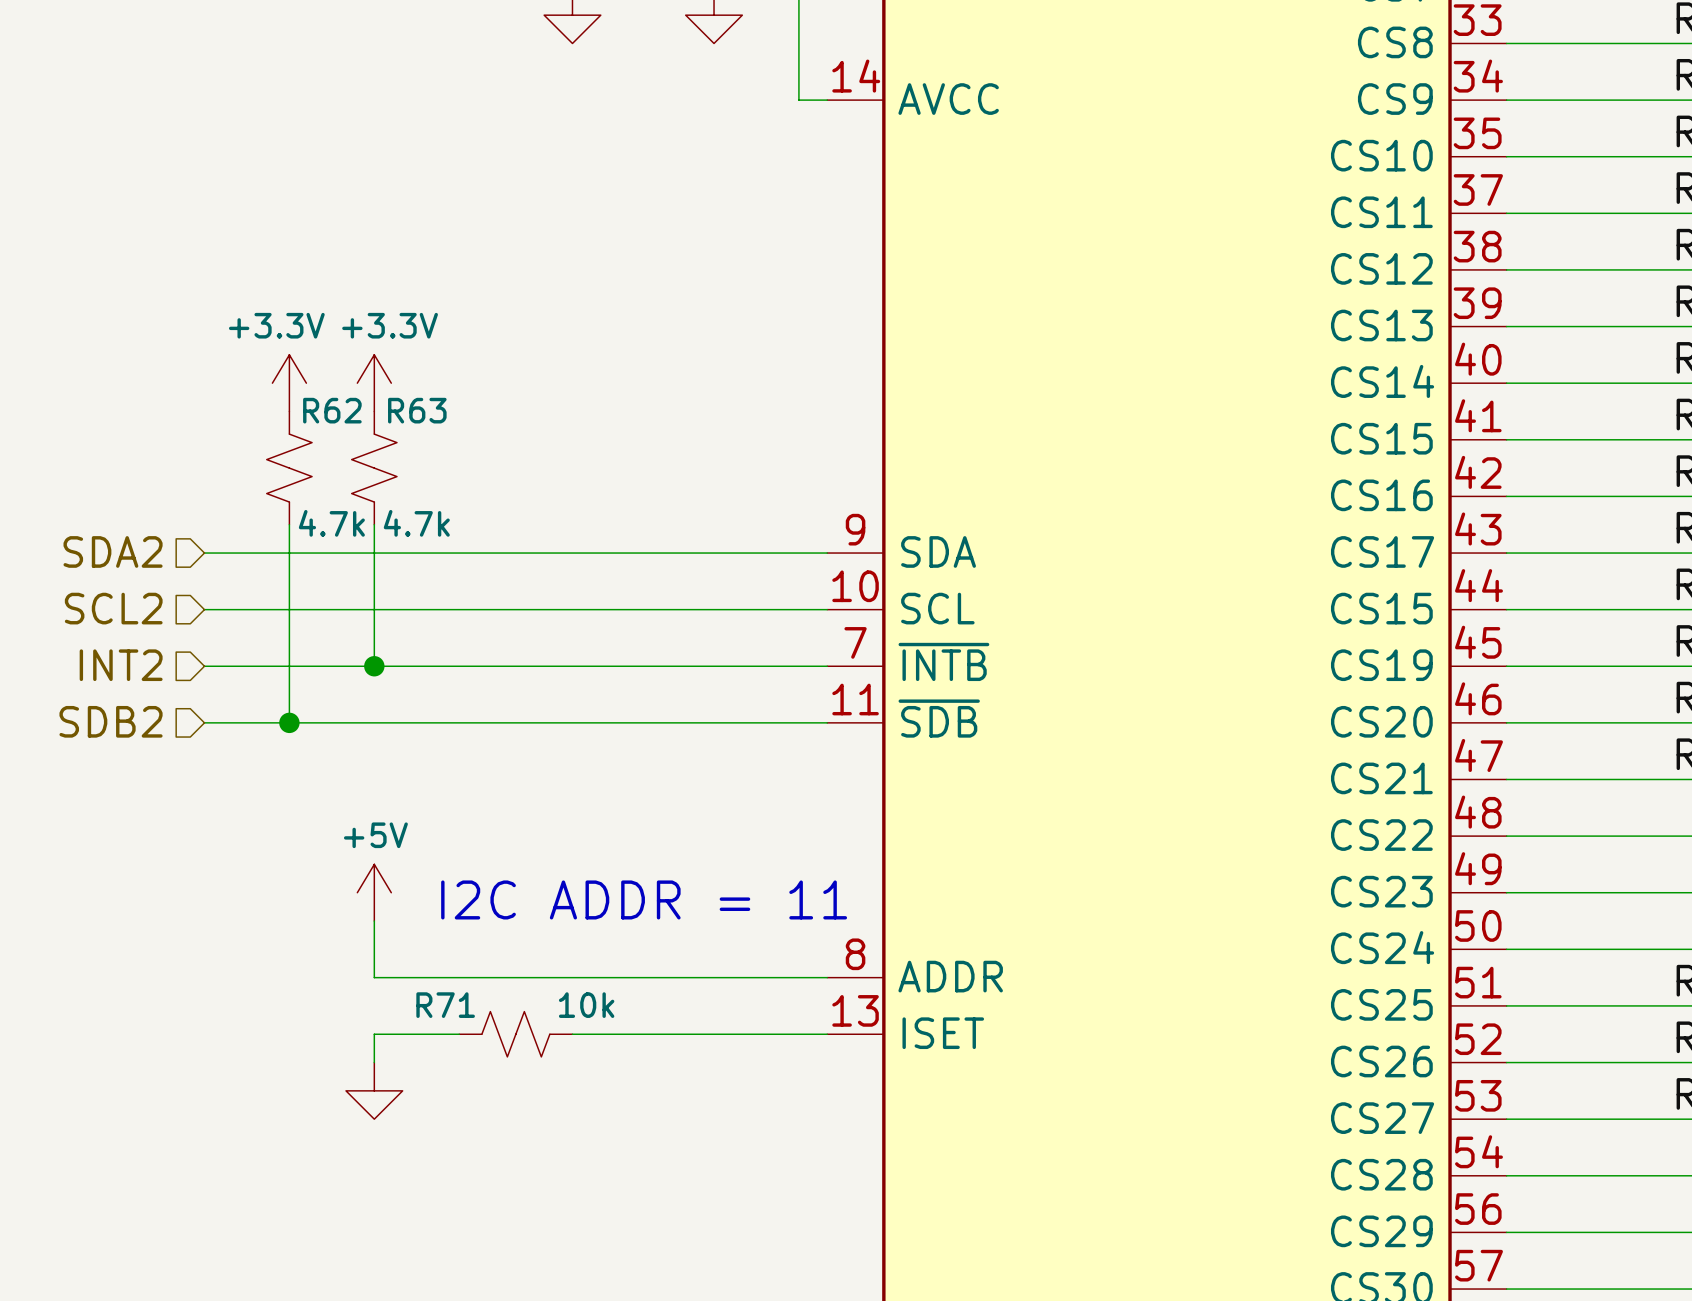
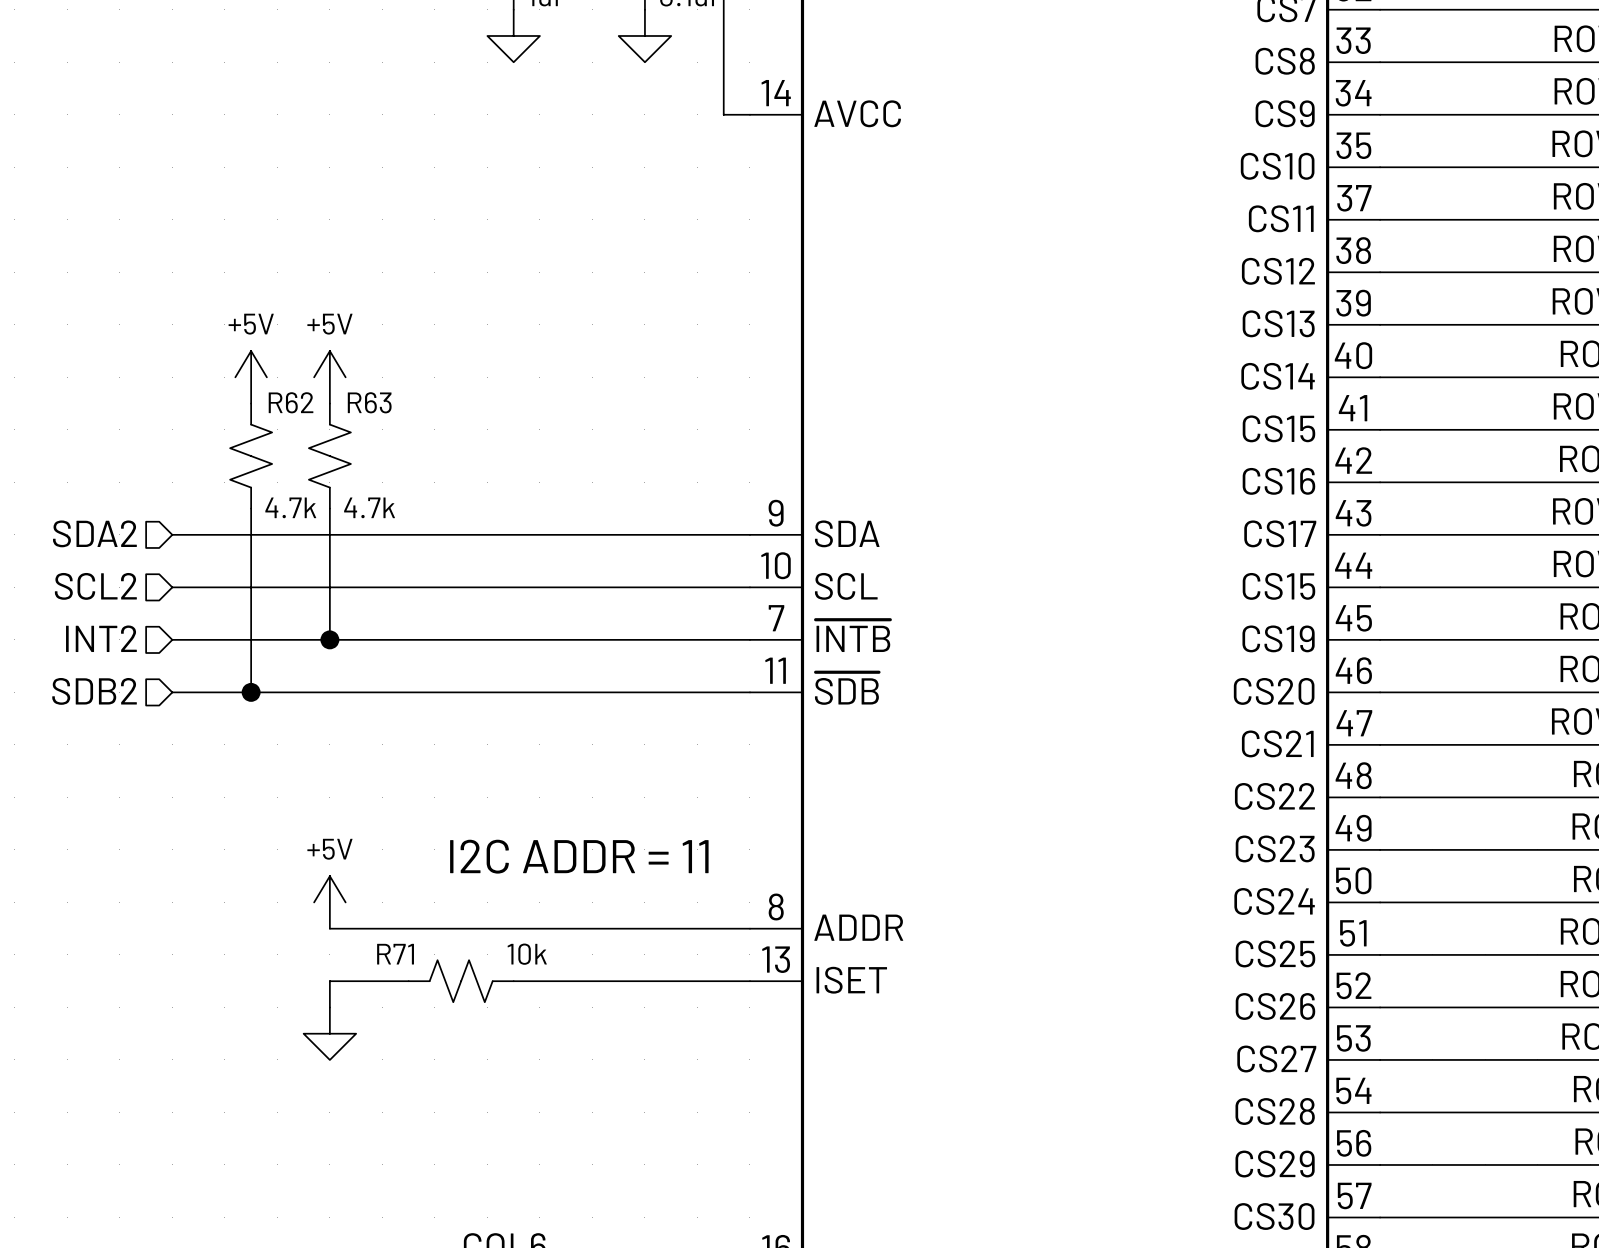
power symbol: +3.3V (289, 383) -> +5V (251, 377)
power symbol: +3.3V (374, 383) -> +5V (329, 377)
power symbol position: +5V (374, 892) -> +5V (329, 902)

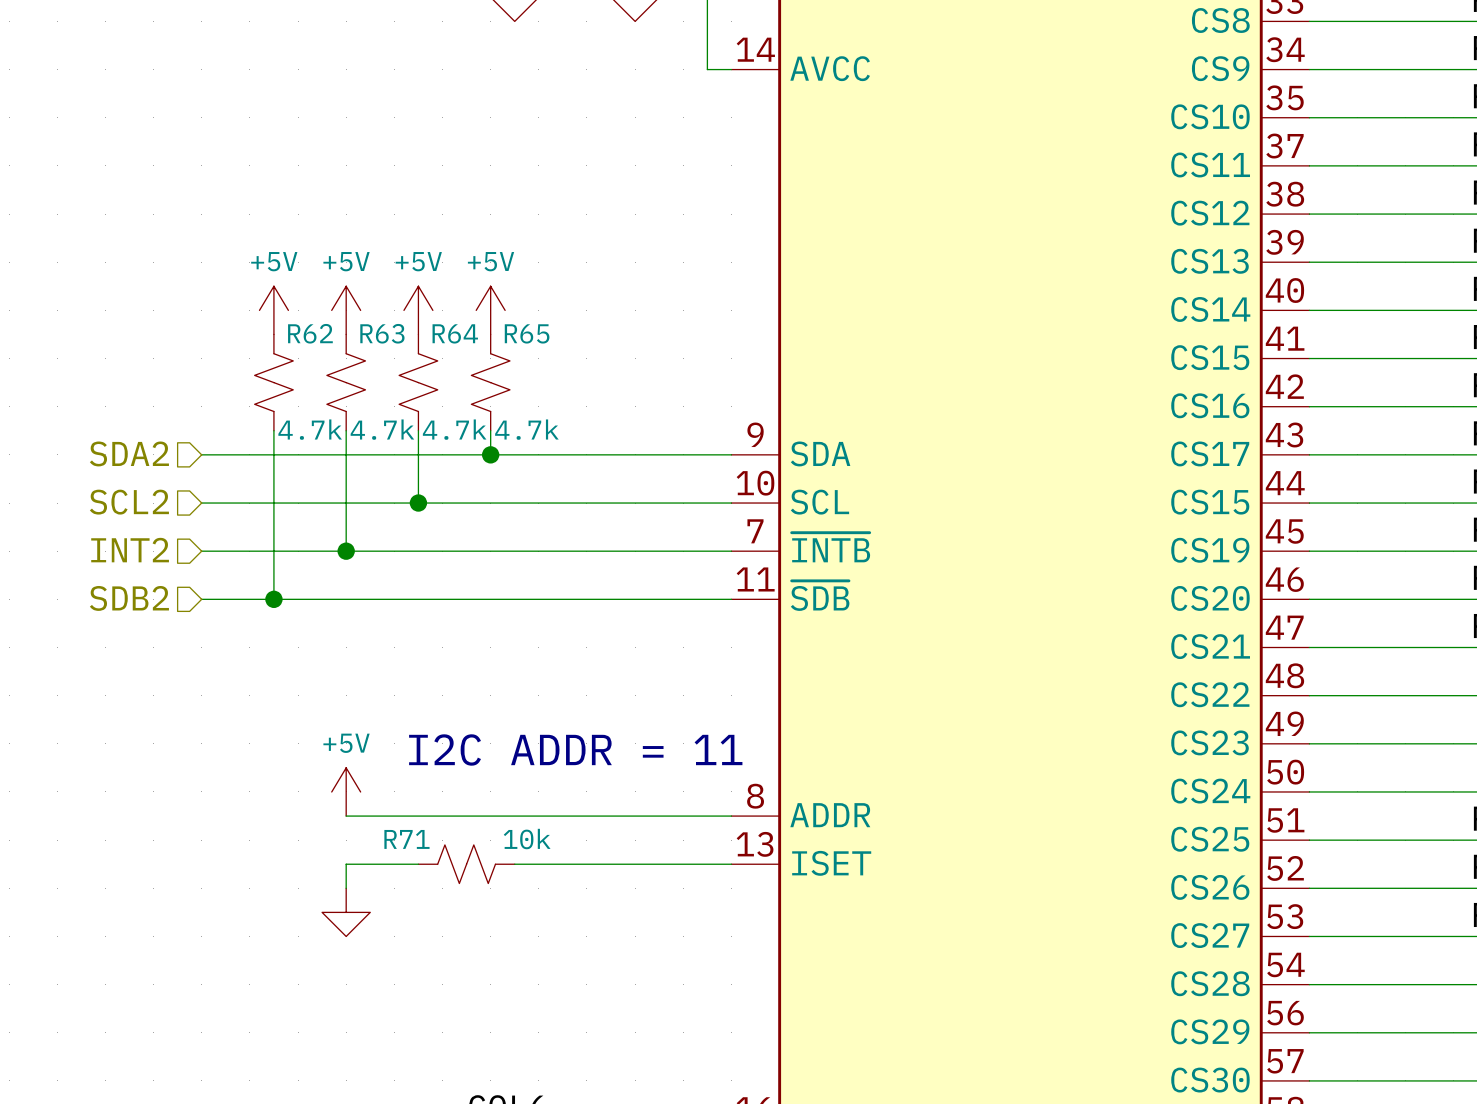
power symbol: none -> +5V (418, 310)
power symbol: none -> +5V (490, 310)
R64: none -> 4.7k (418, 382)
R65: none -> 4.7k (490, 382)
wire: none -> (418, 430) (418, 503)
wire: none -> (490, 430) (490, 454)
junction: none -> (490, 454)
junction: none -> (418, 503)

